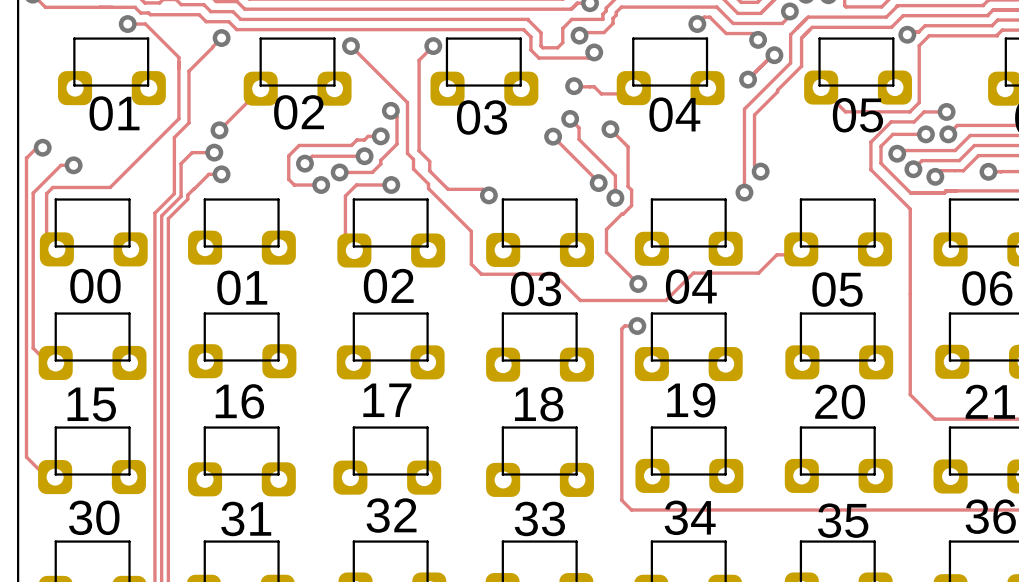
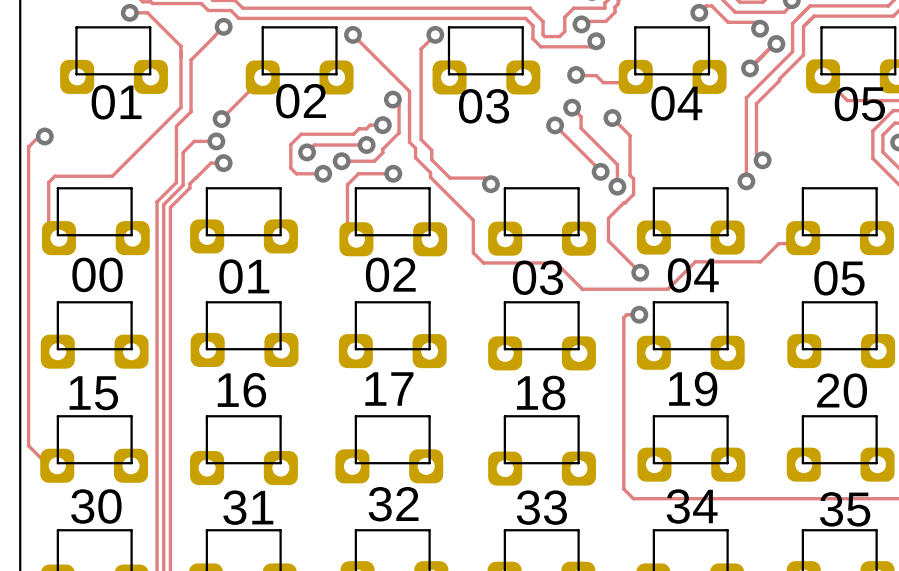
track: (73, 165) (61, 165) (33, 193) (33, 348) (52, 367) (55, 367) -> none
via: (73, 165) -> none

